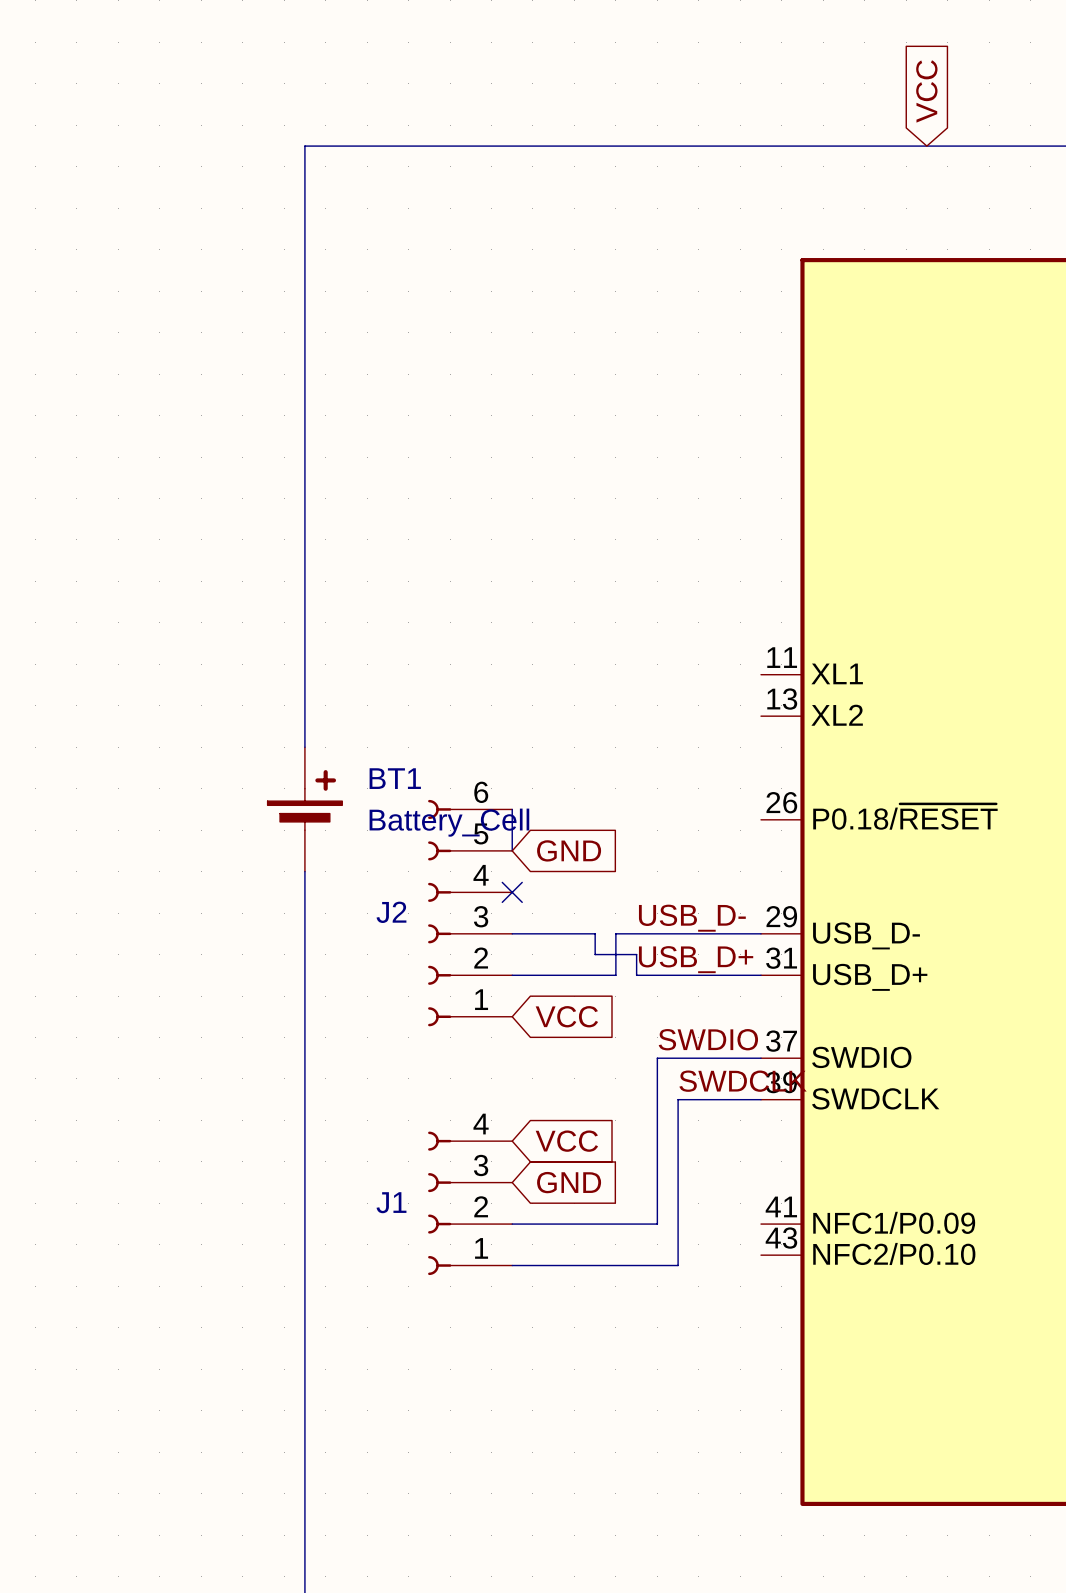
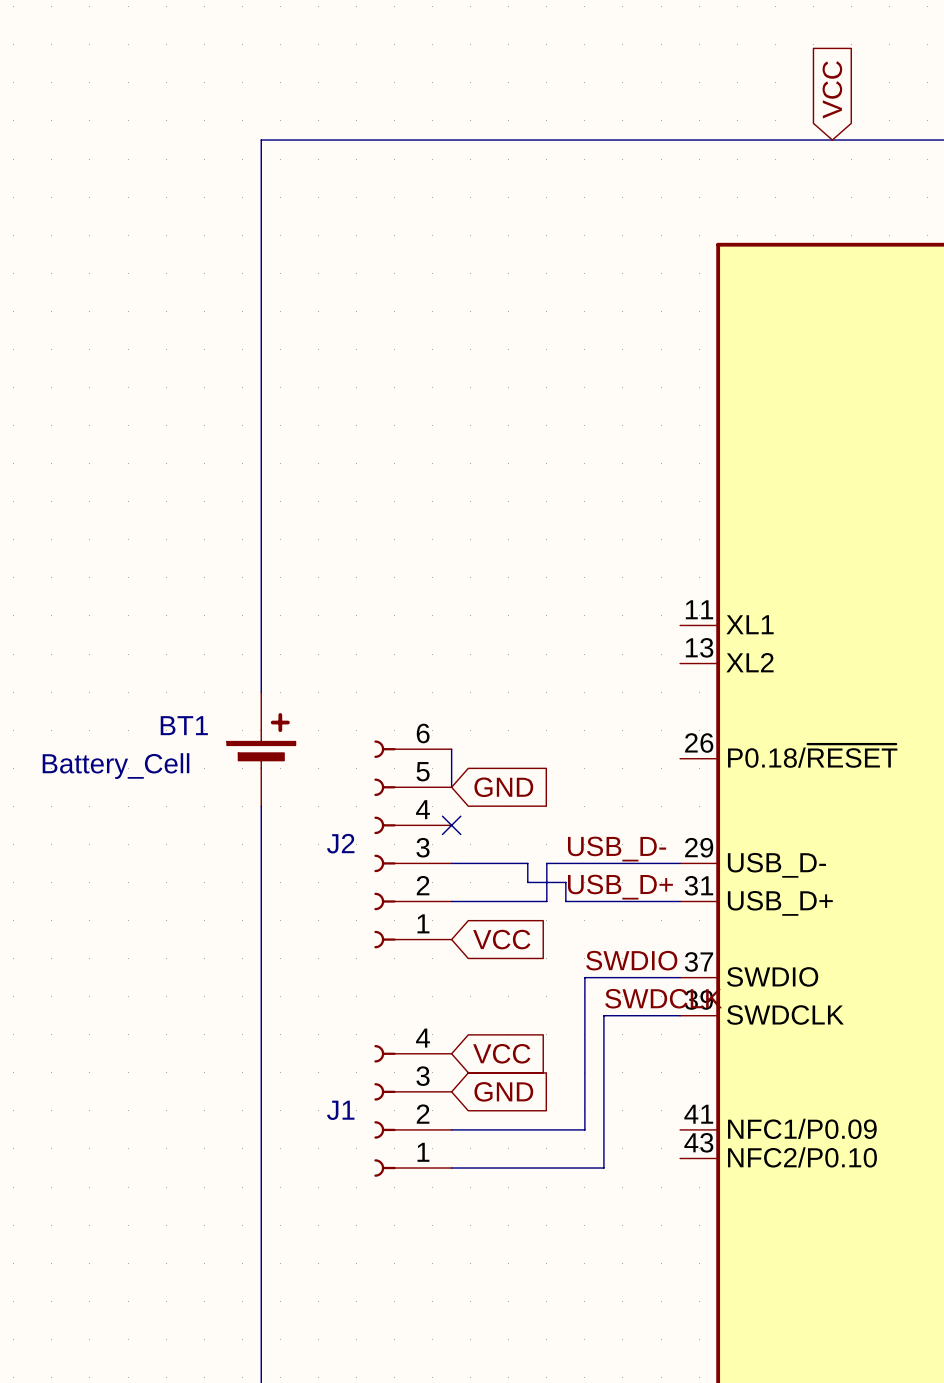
BT1 name position: BT1 (395, 778) -> BT1 (184, 725)
BT1 value position: Battery_Cell (449, 822) -> Battery_Cell (116, 766)

